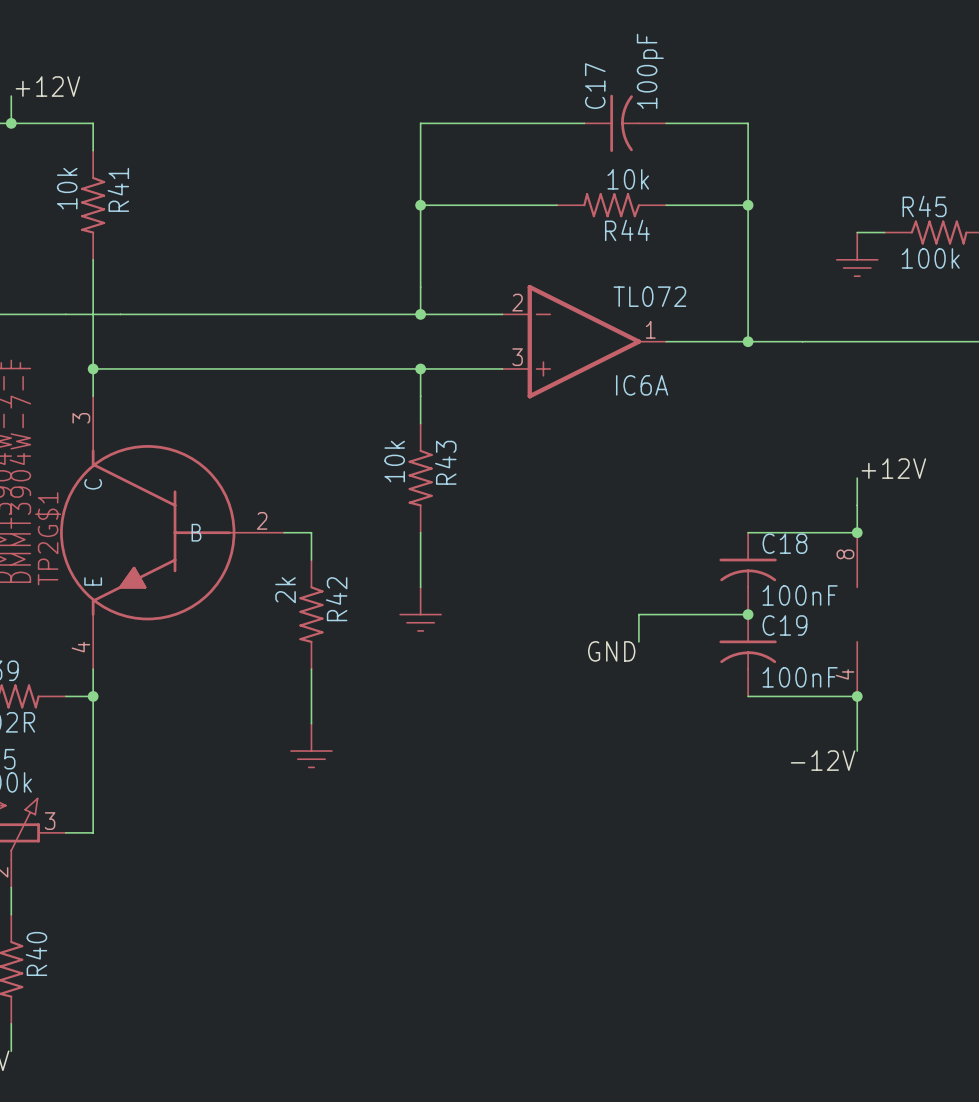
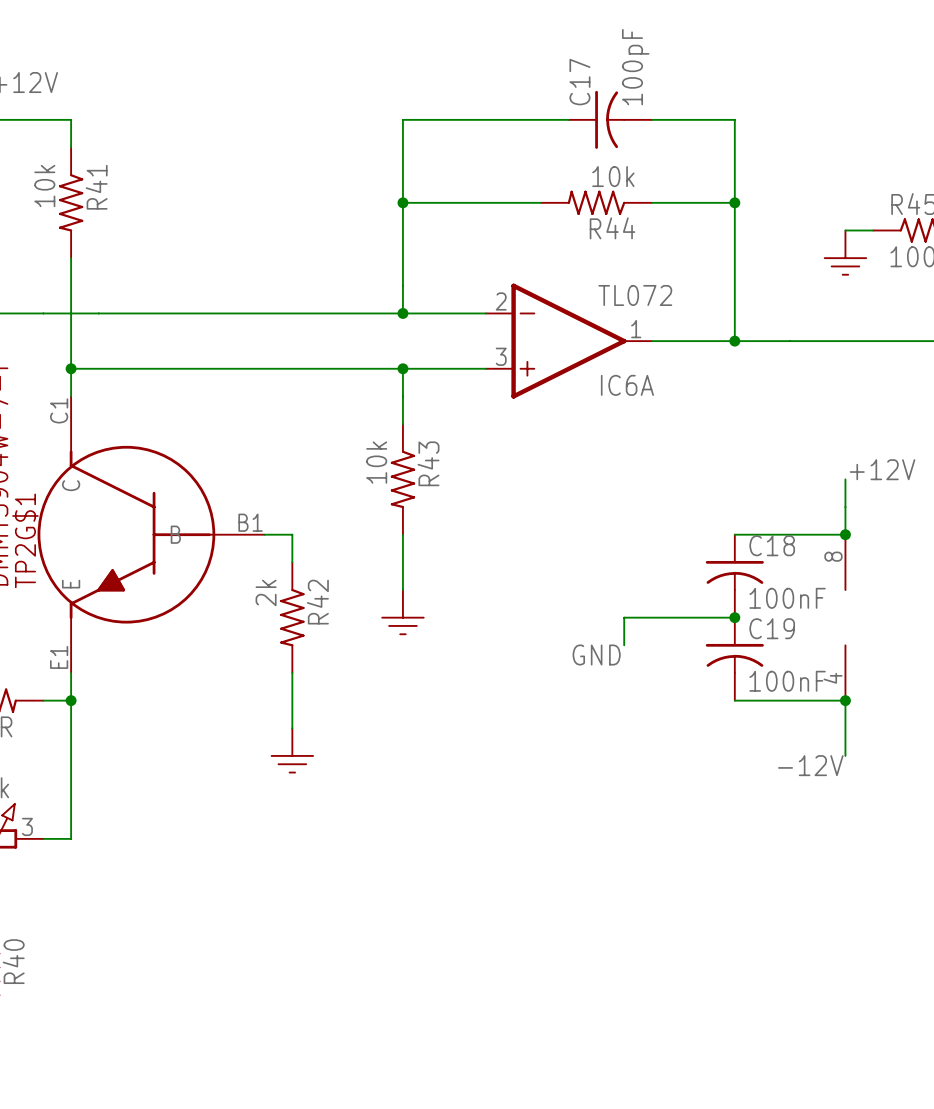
TP2G$1 pin number: 3 (81, 418) -> C1 (59, 410)
TP2G$1 pin number: 2 (262, 520) -> B1 (250, 522)
TP2G$1 pin number: 4 (80, 647) -> E1 (59, 657)

